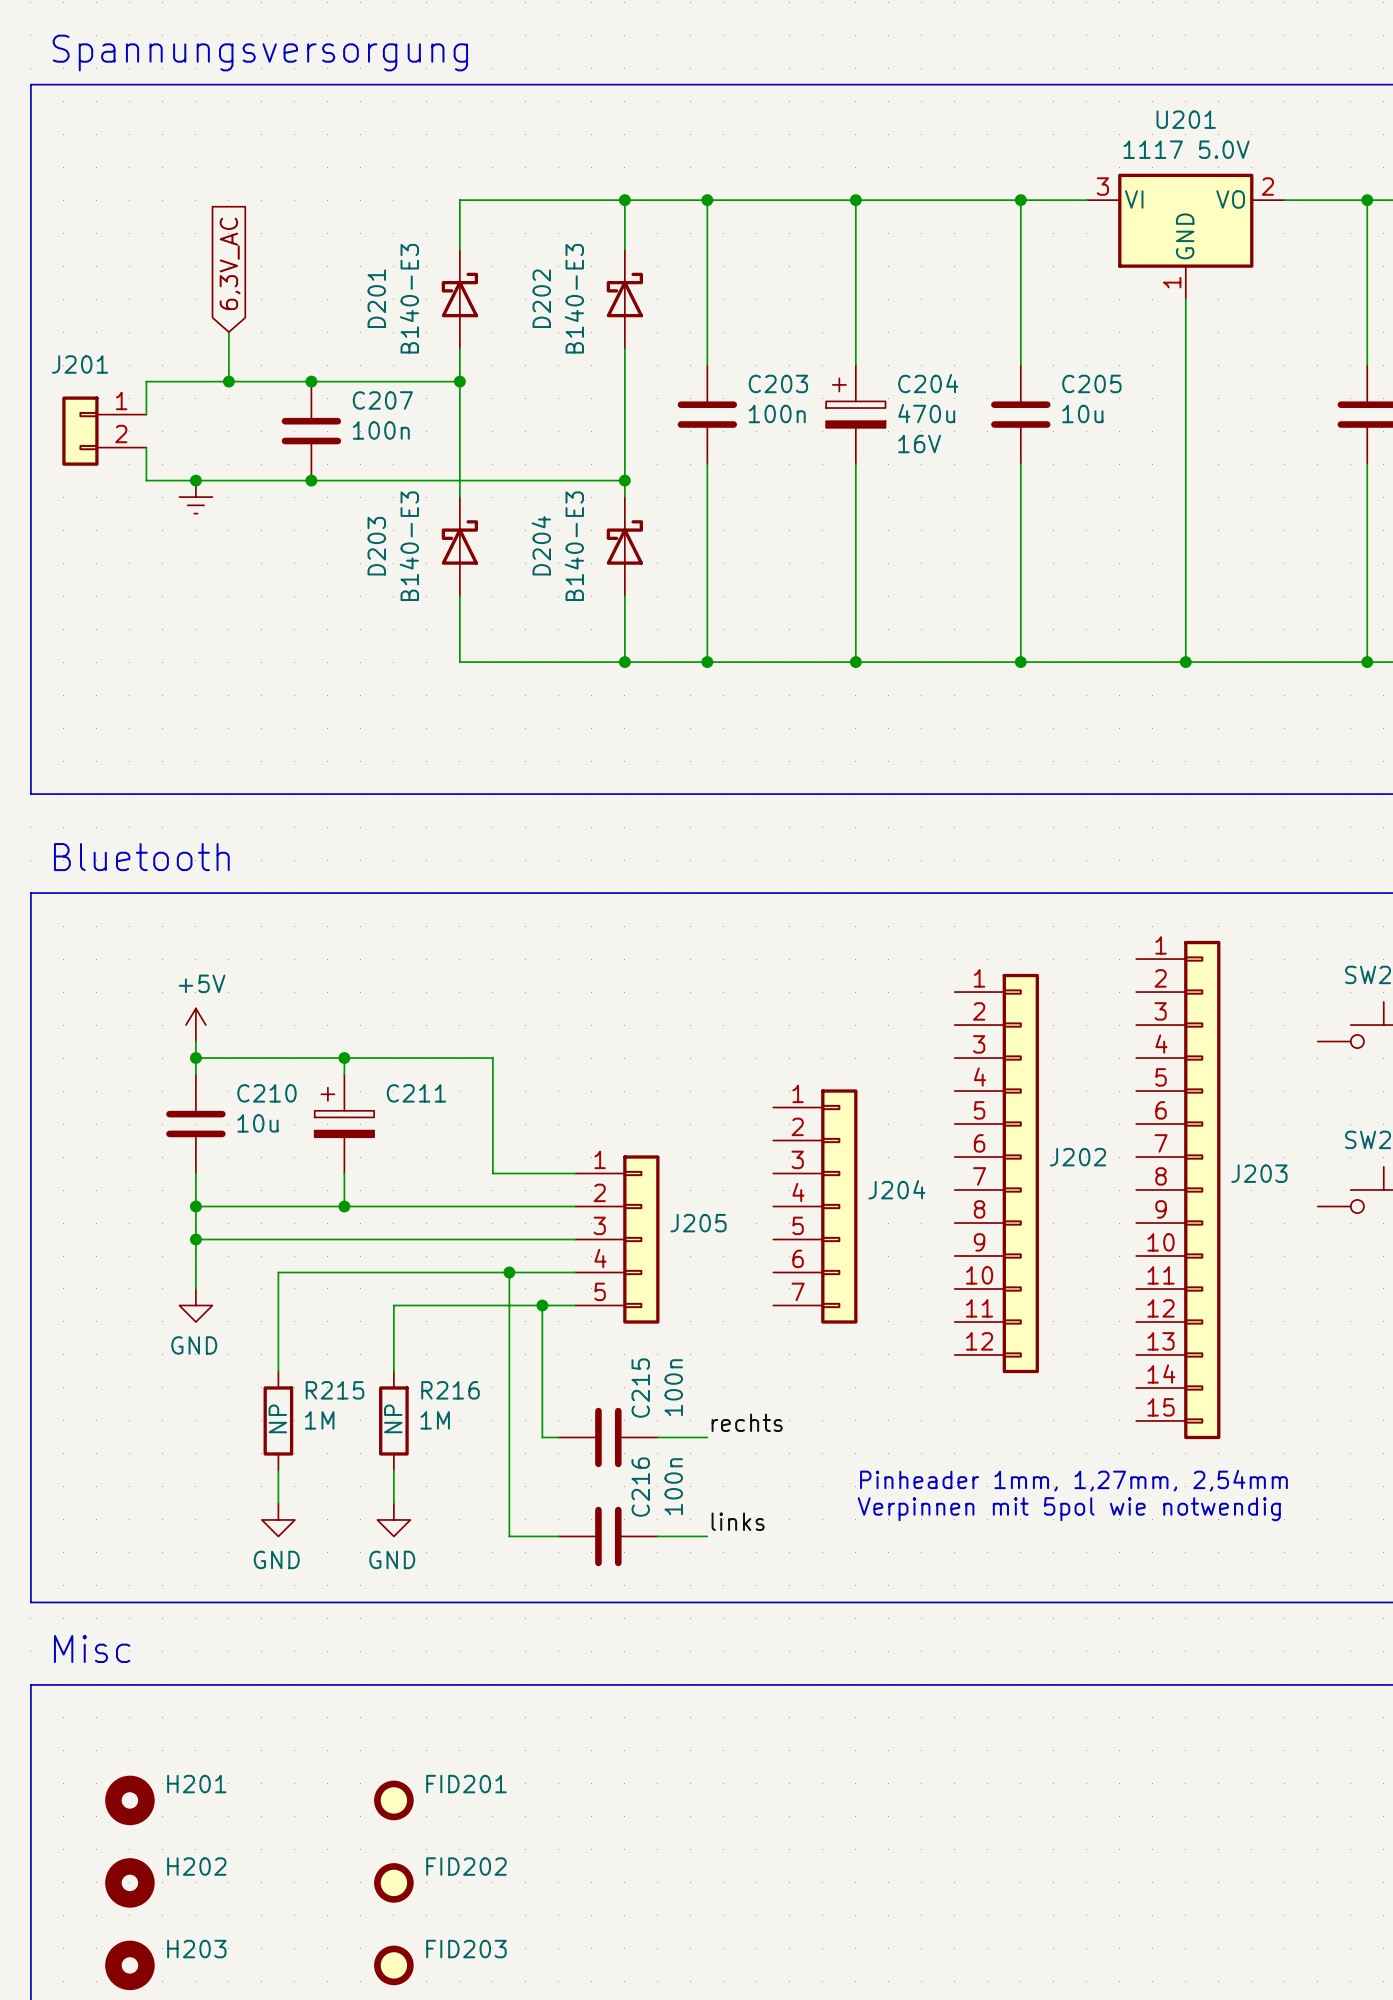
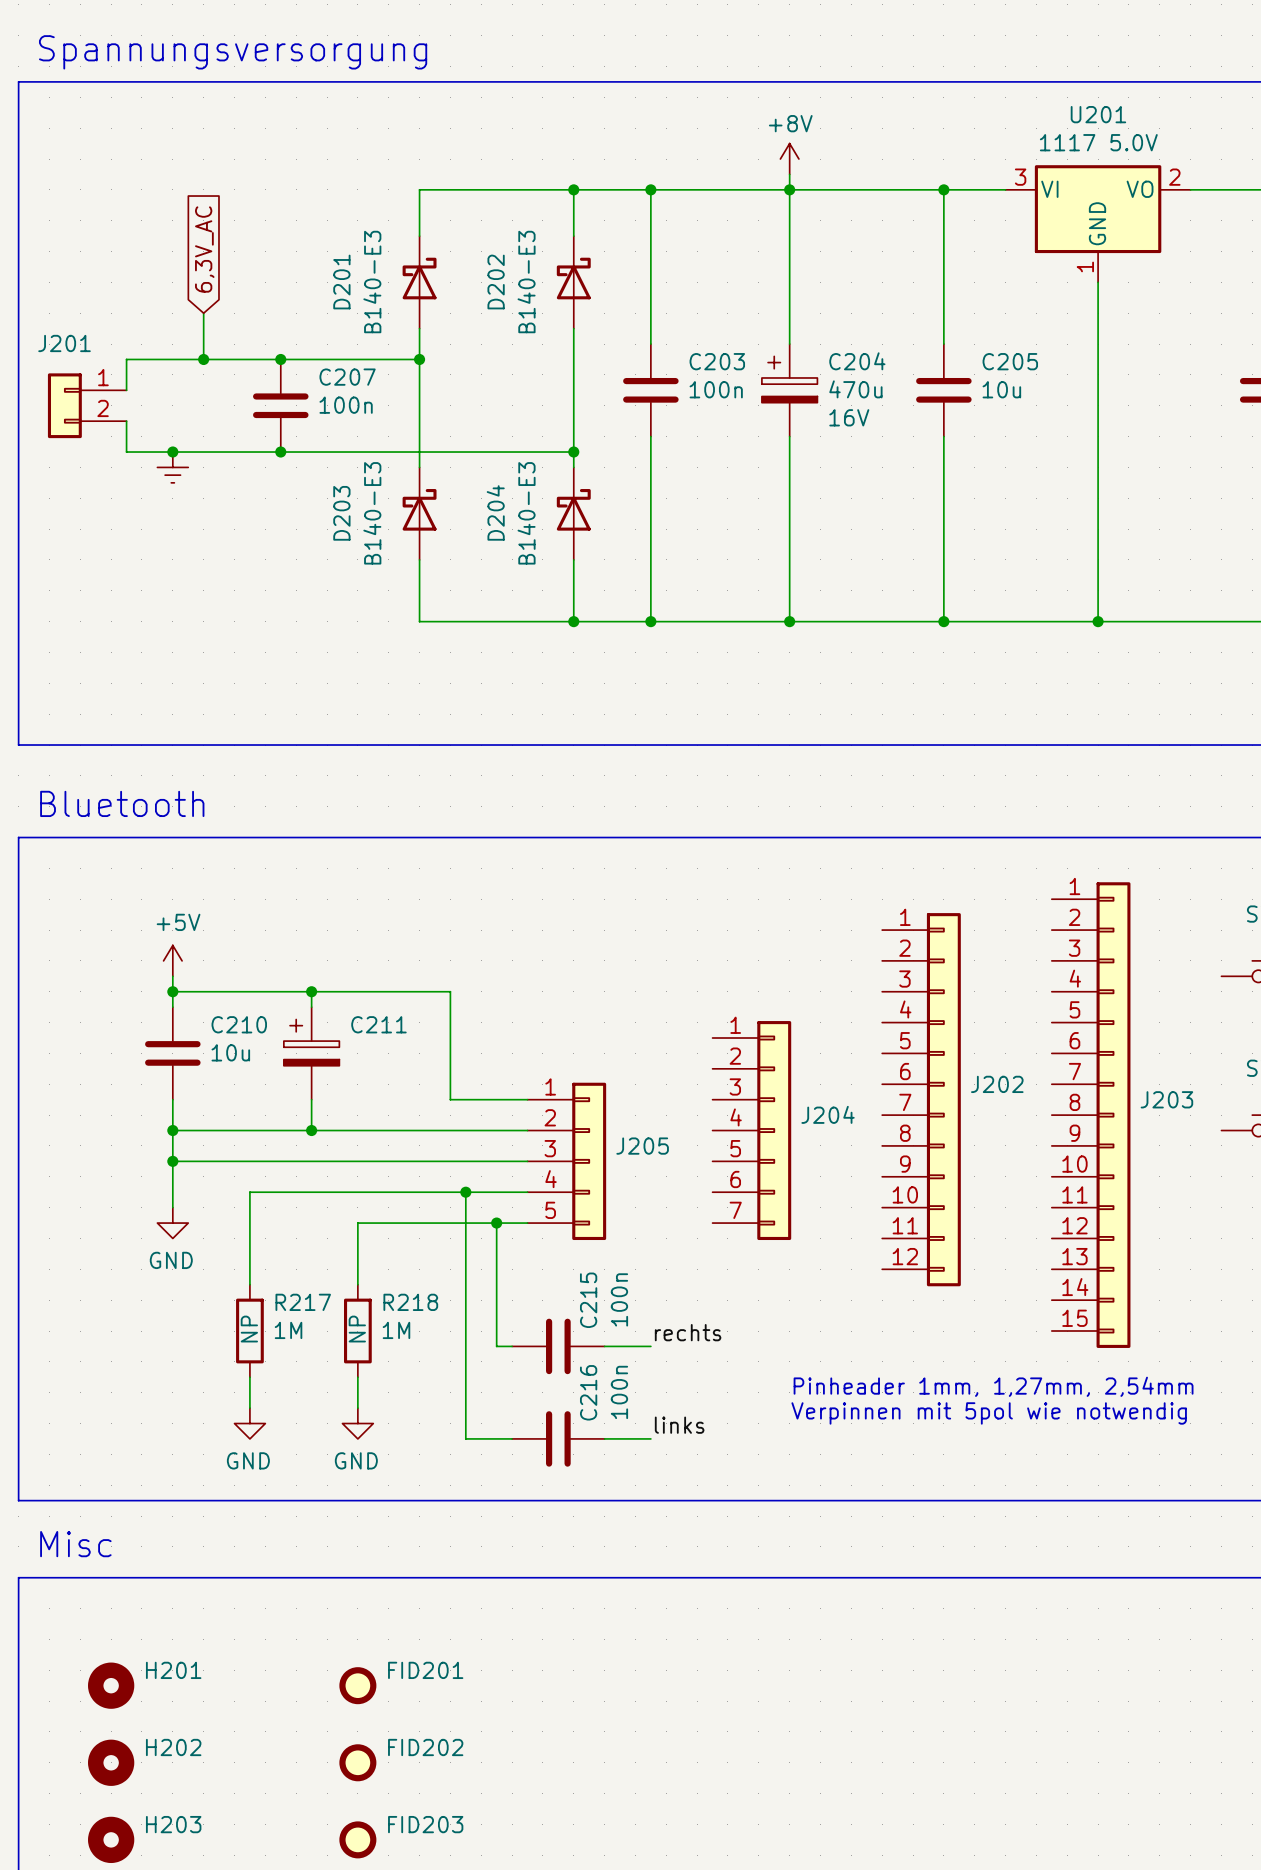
power symbol: none -> +8V (789, 159)
wire: none -> (789, 174) (789, 189)
R215 name: R215 (335, 1390) -> R217 (303, 1302)
R216 name: R216 (450, 1390) -> R218 (410, 1302)

